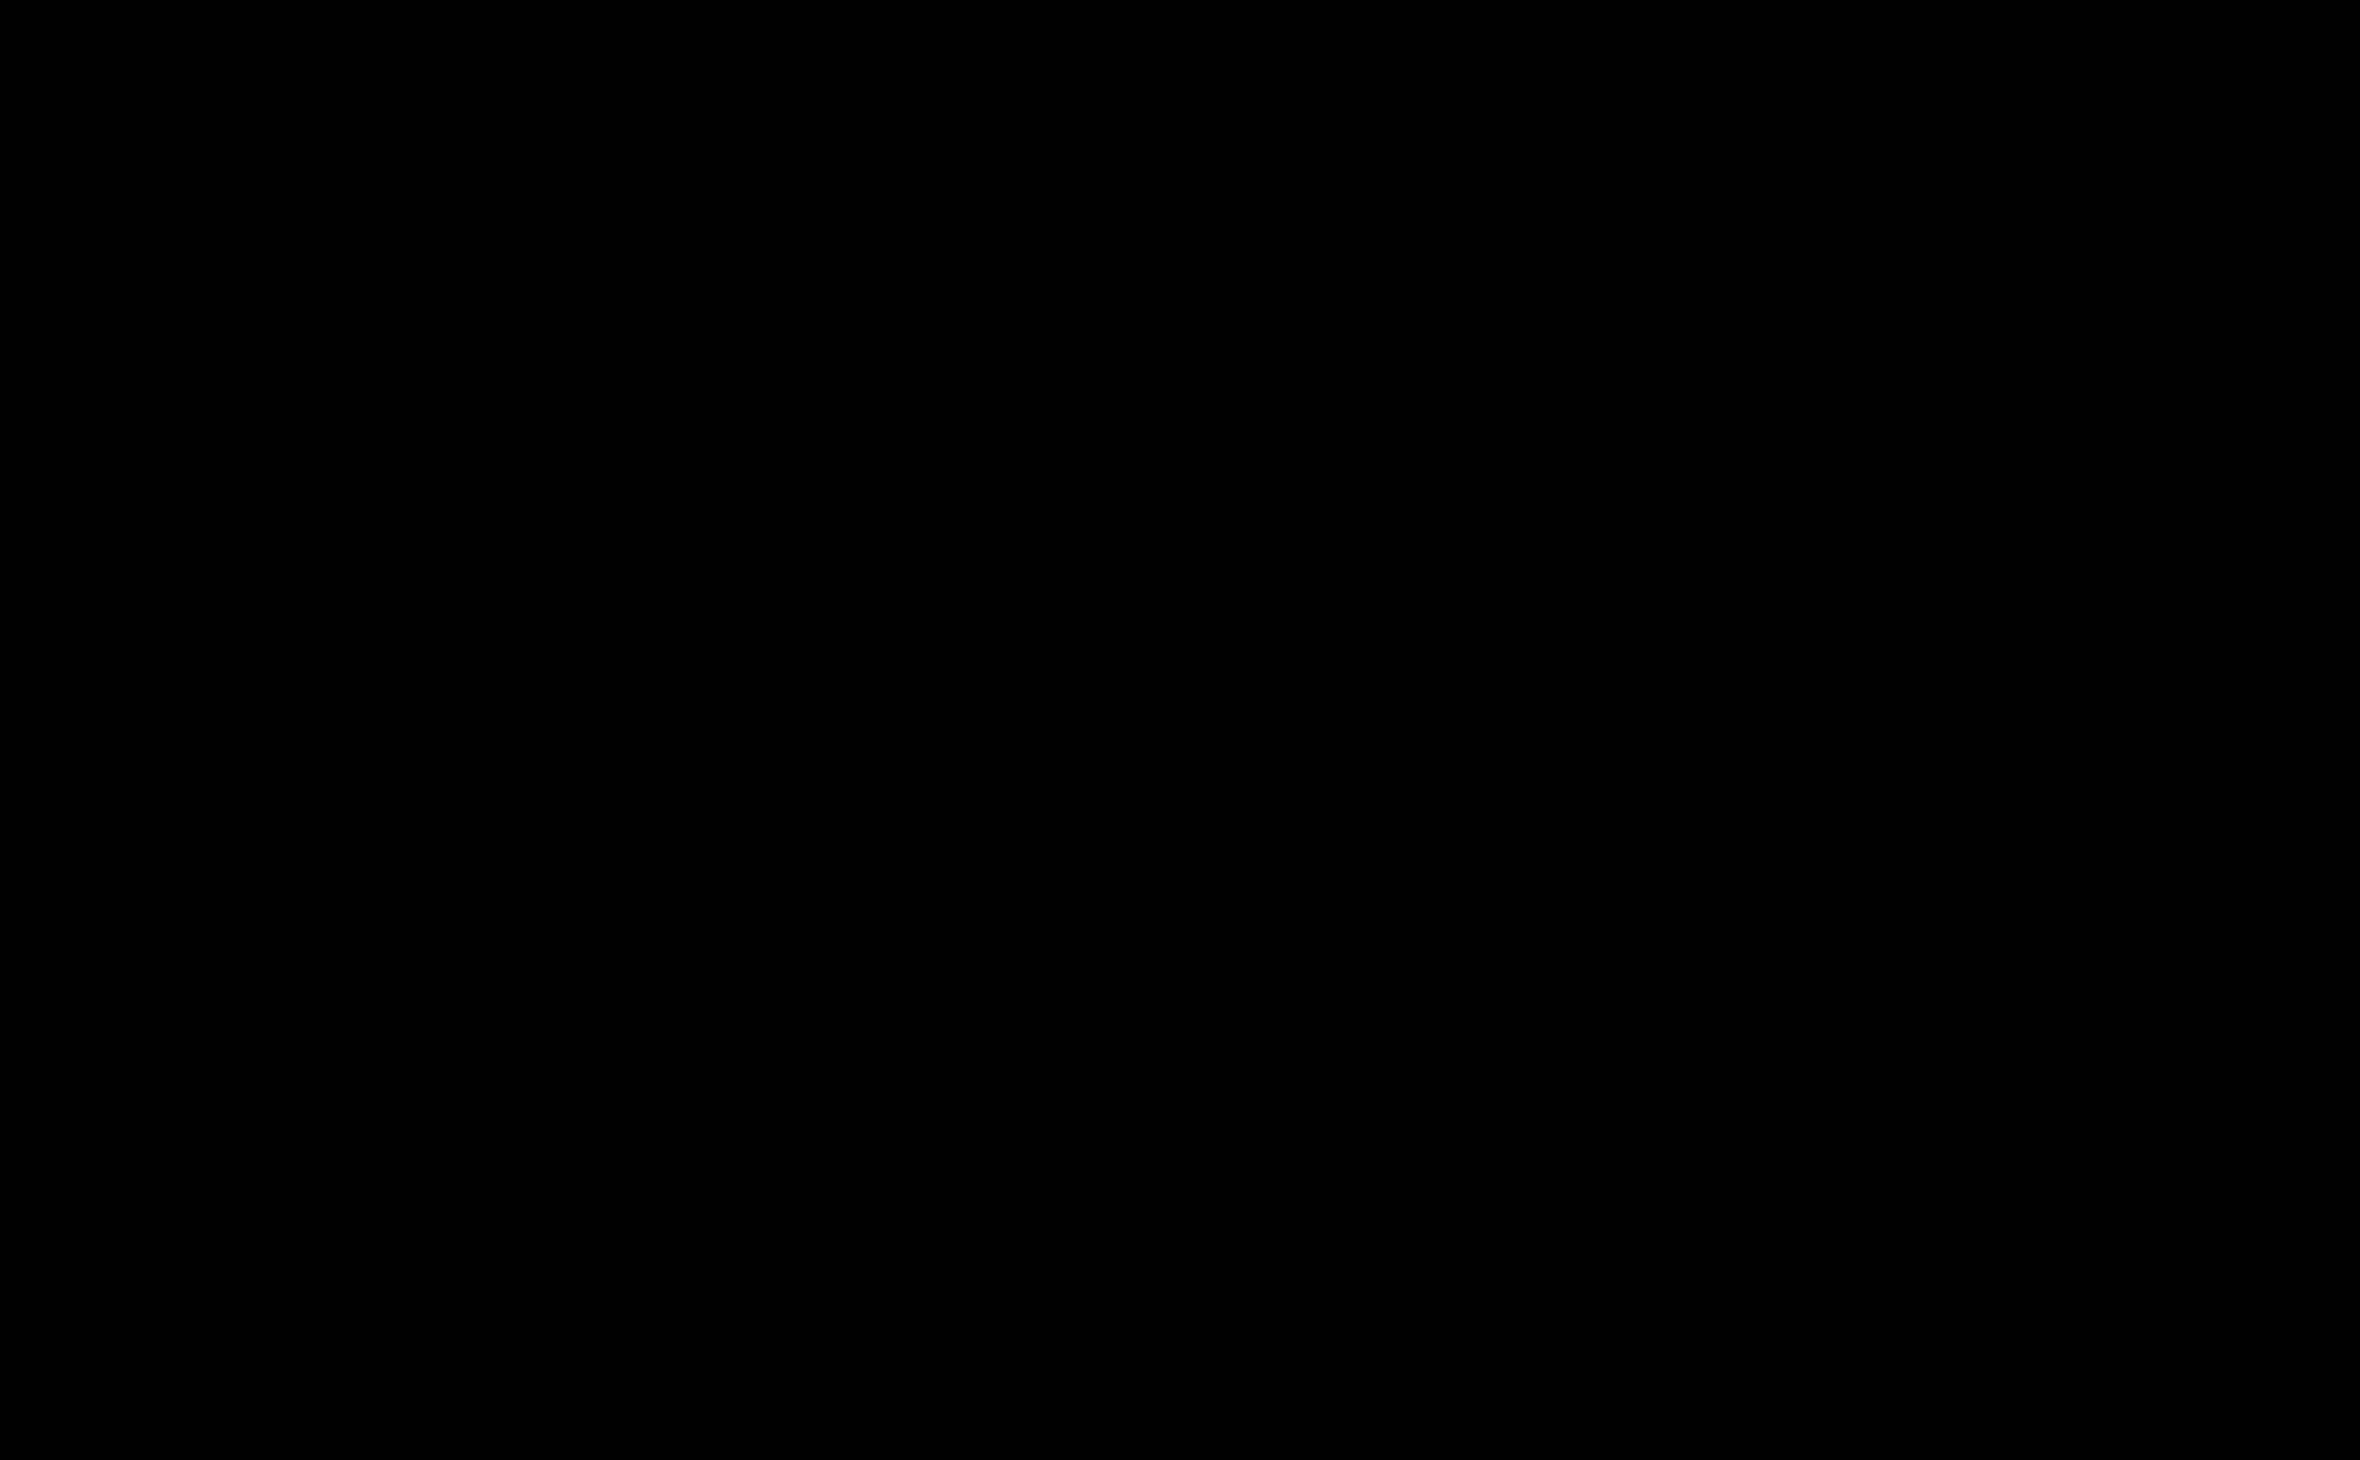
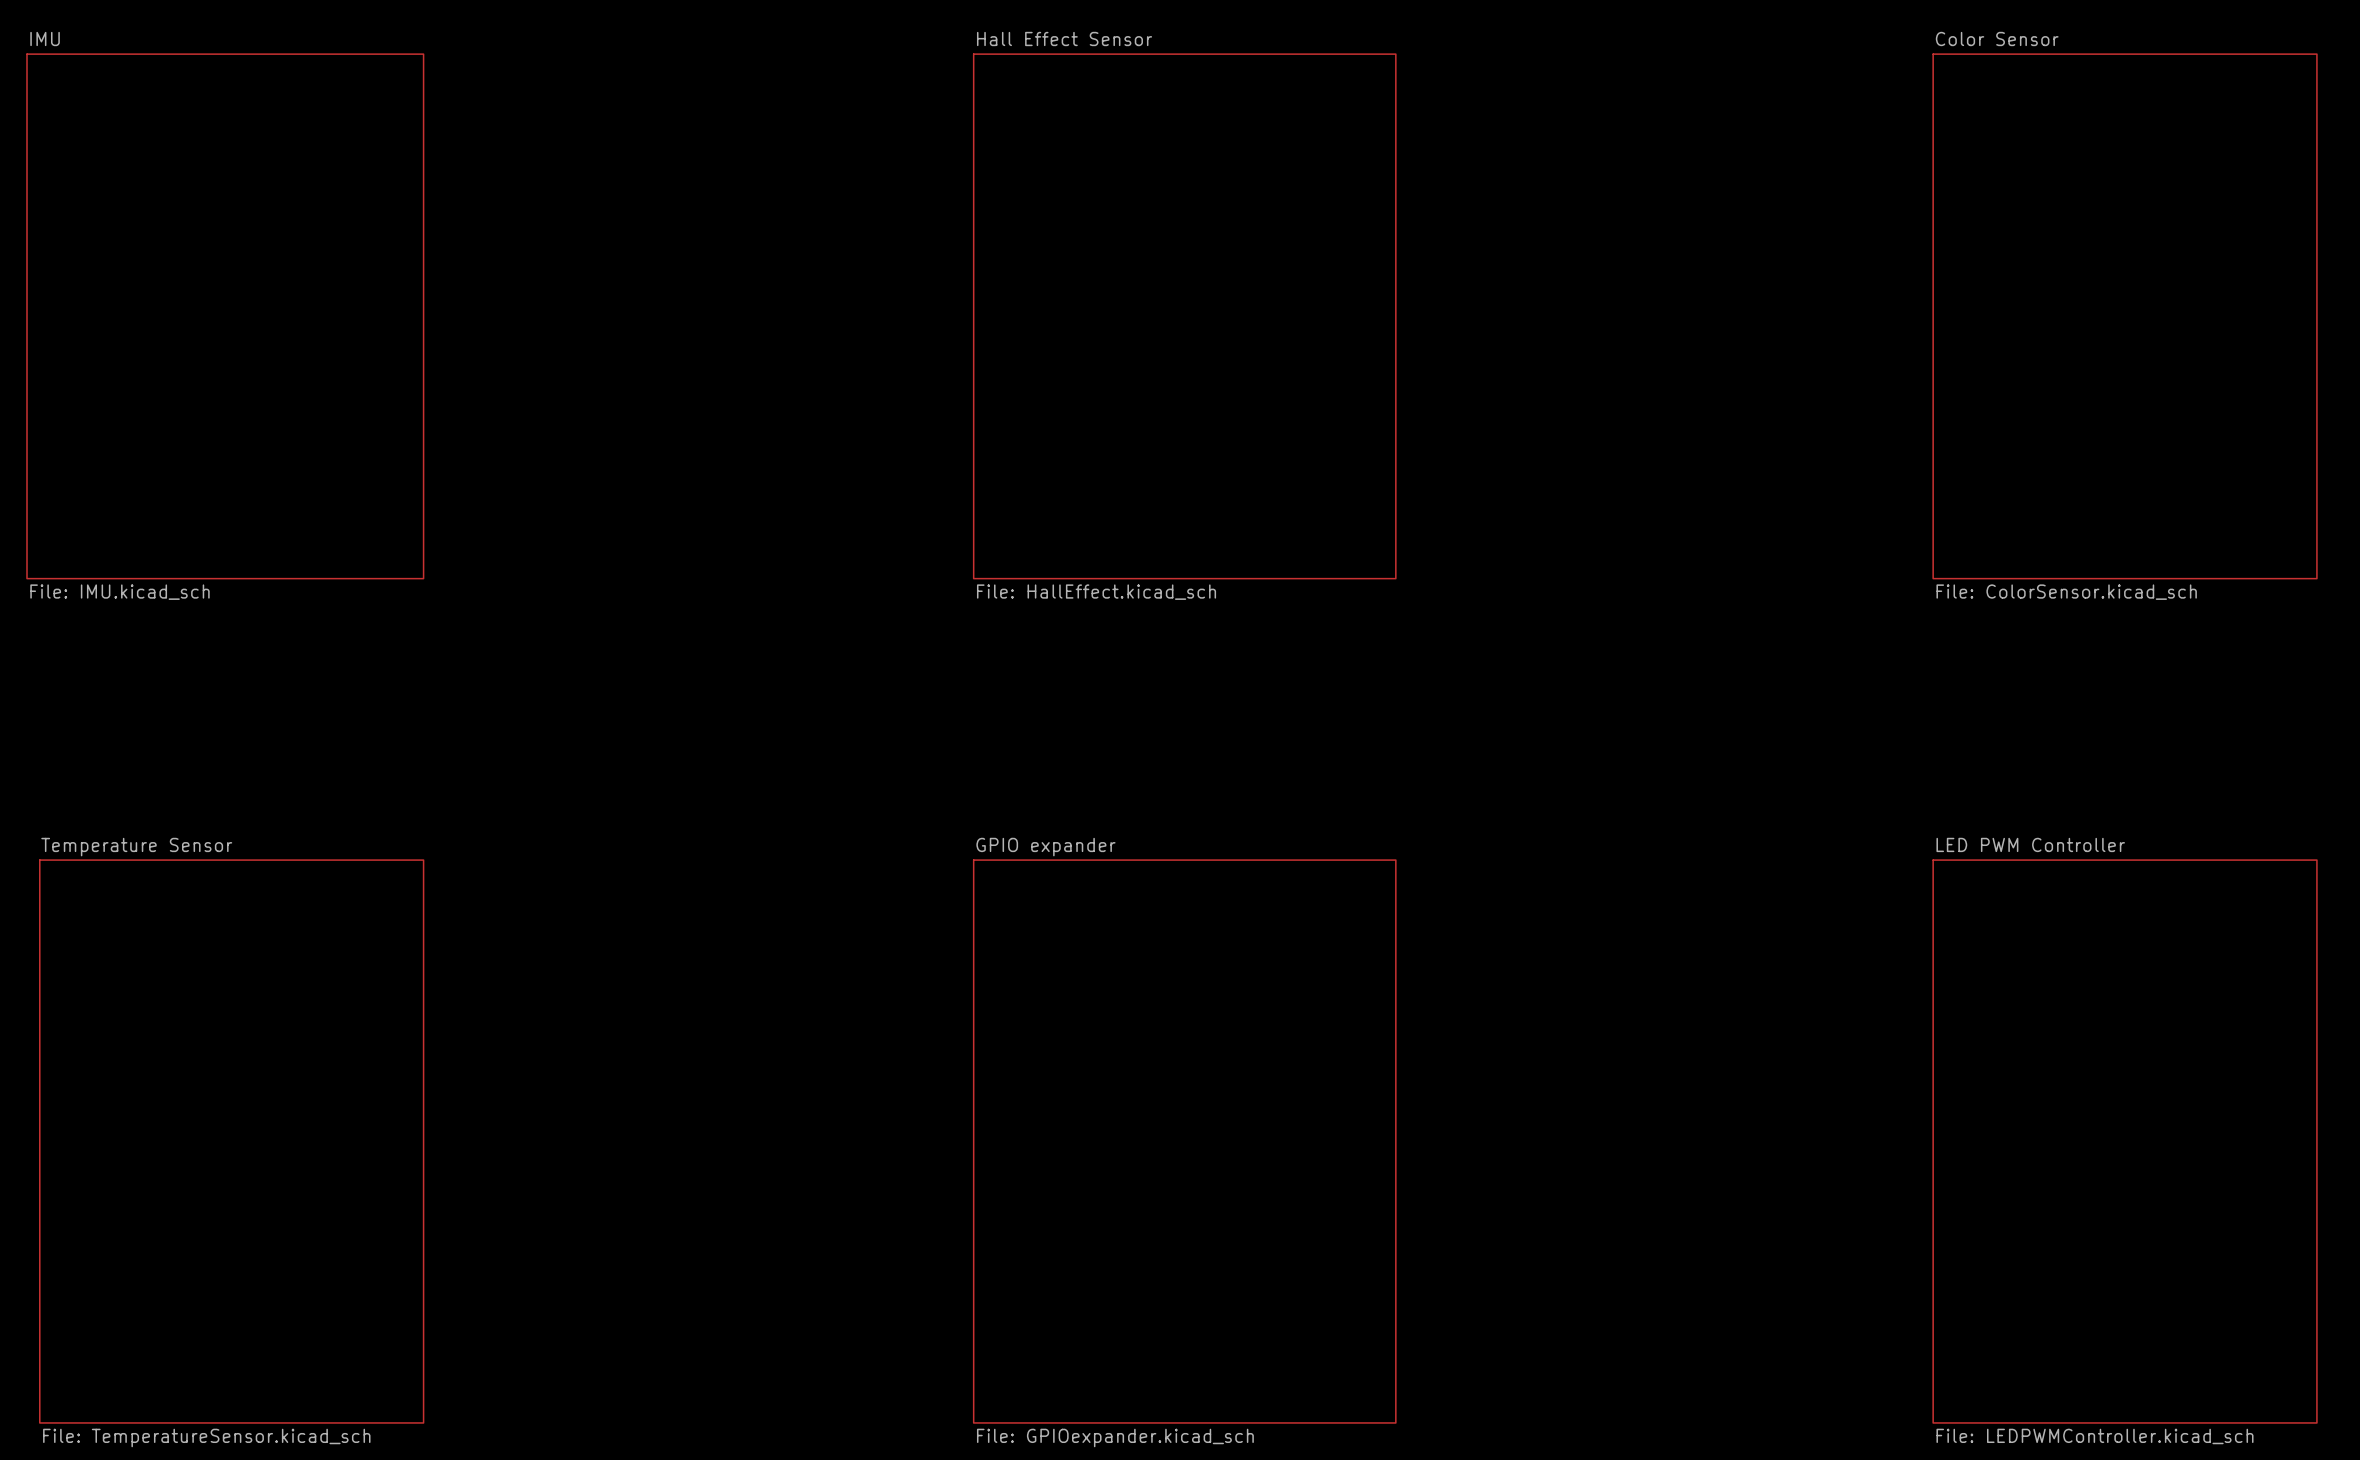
sheet IMU: none -> File: IMU.kicad_sch (225, 316)
sheet Hall Effect Sensor: none -> File: HallEffect.kicad_sch (1184, 316)
sheet Color Sensor: none -> File: ColorSensor.kicad_sch (2125, 316)
sheet Temperature Sensor: none -> File: TemperatureSensor.kicad_sch (231, 1141)
sheet GPIO expander: none -> File: GPIOexpander.kicad_sch (1184, 1141)
sheet LED PWM Controller: none -> File: LEDPWMController.kicad_sch (2125, 1141)

